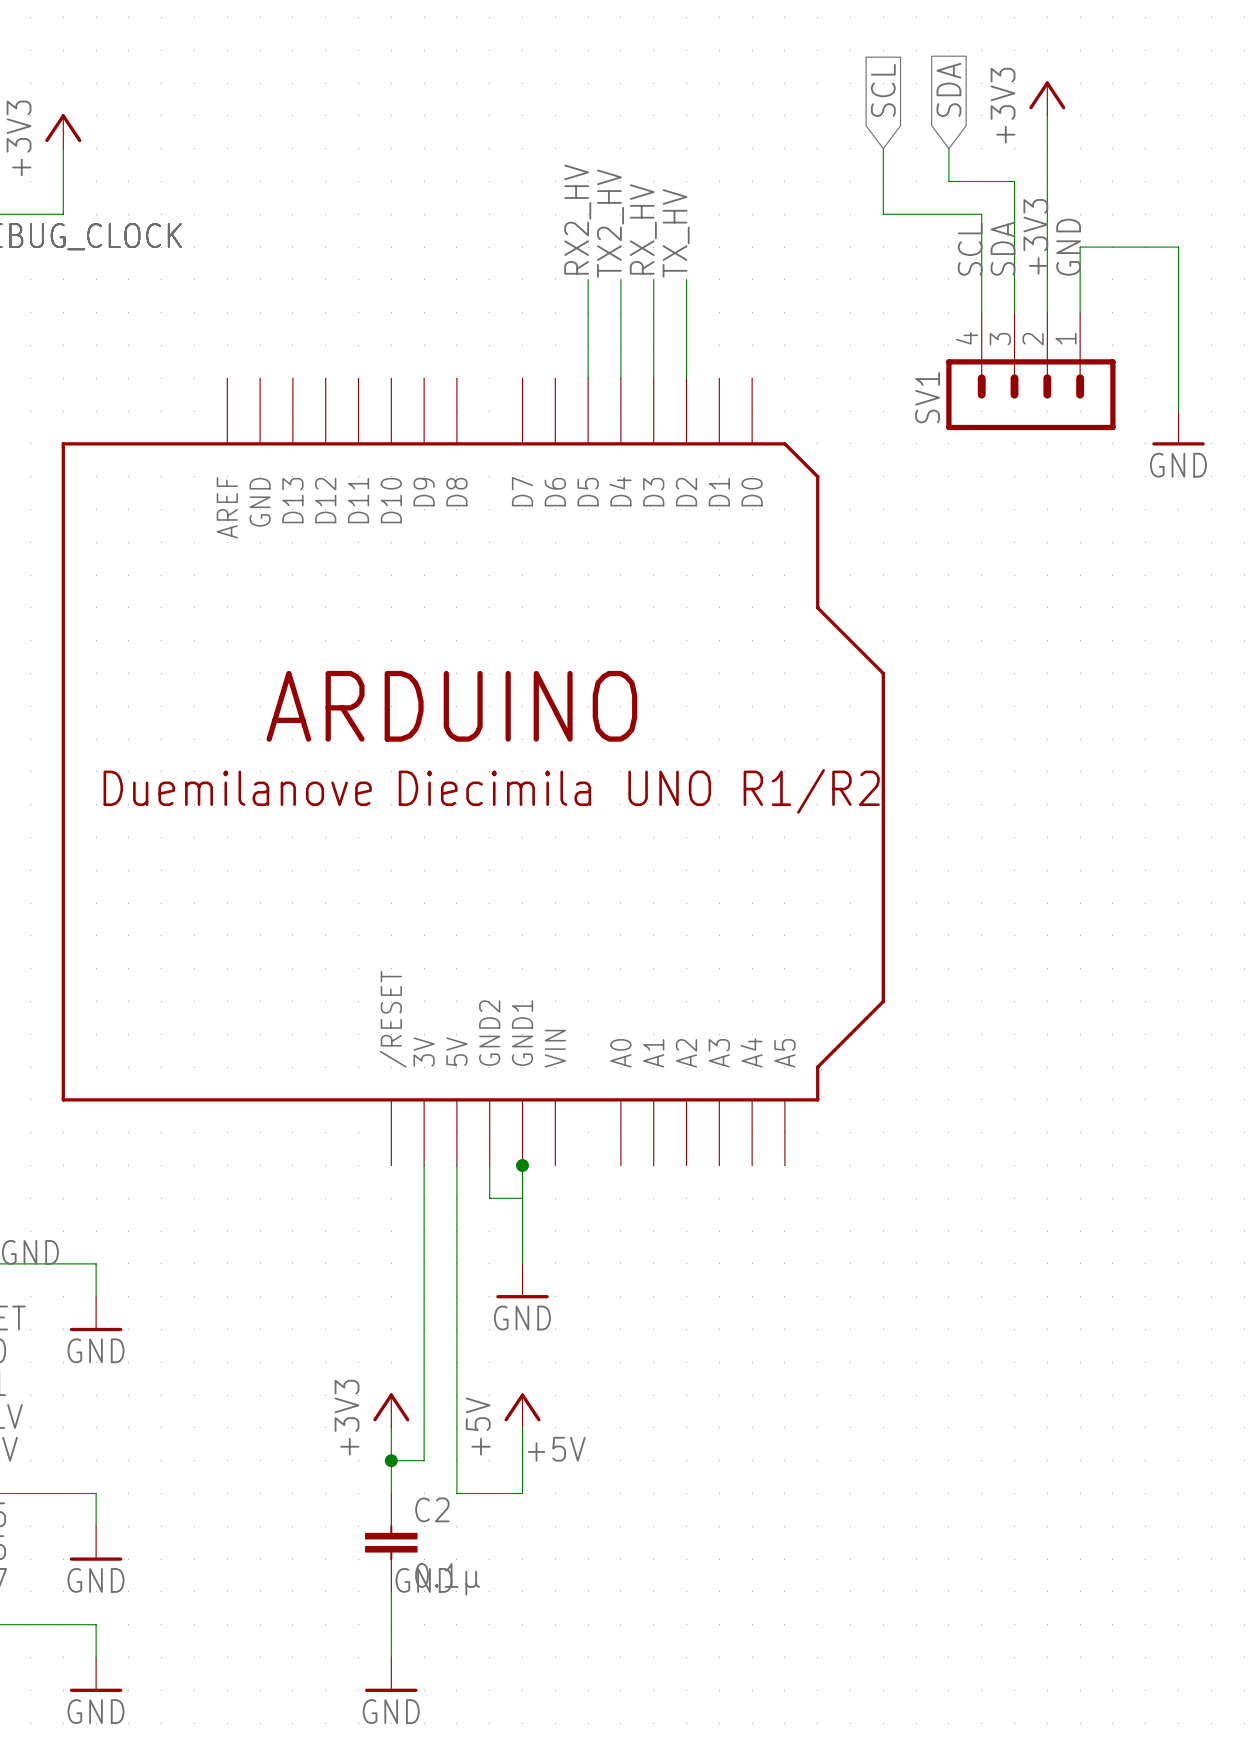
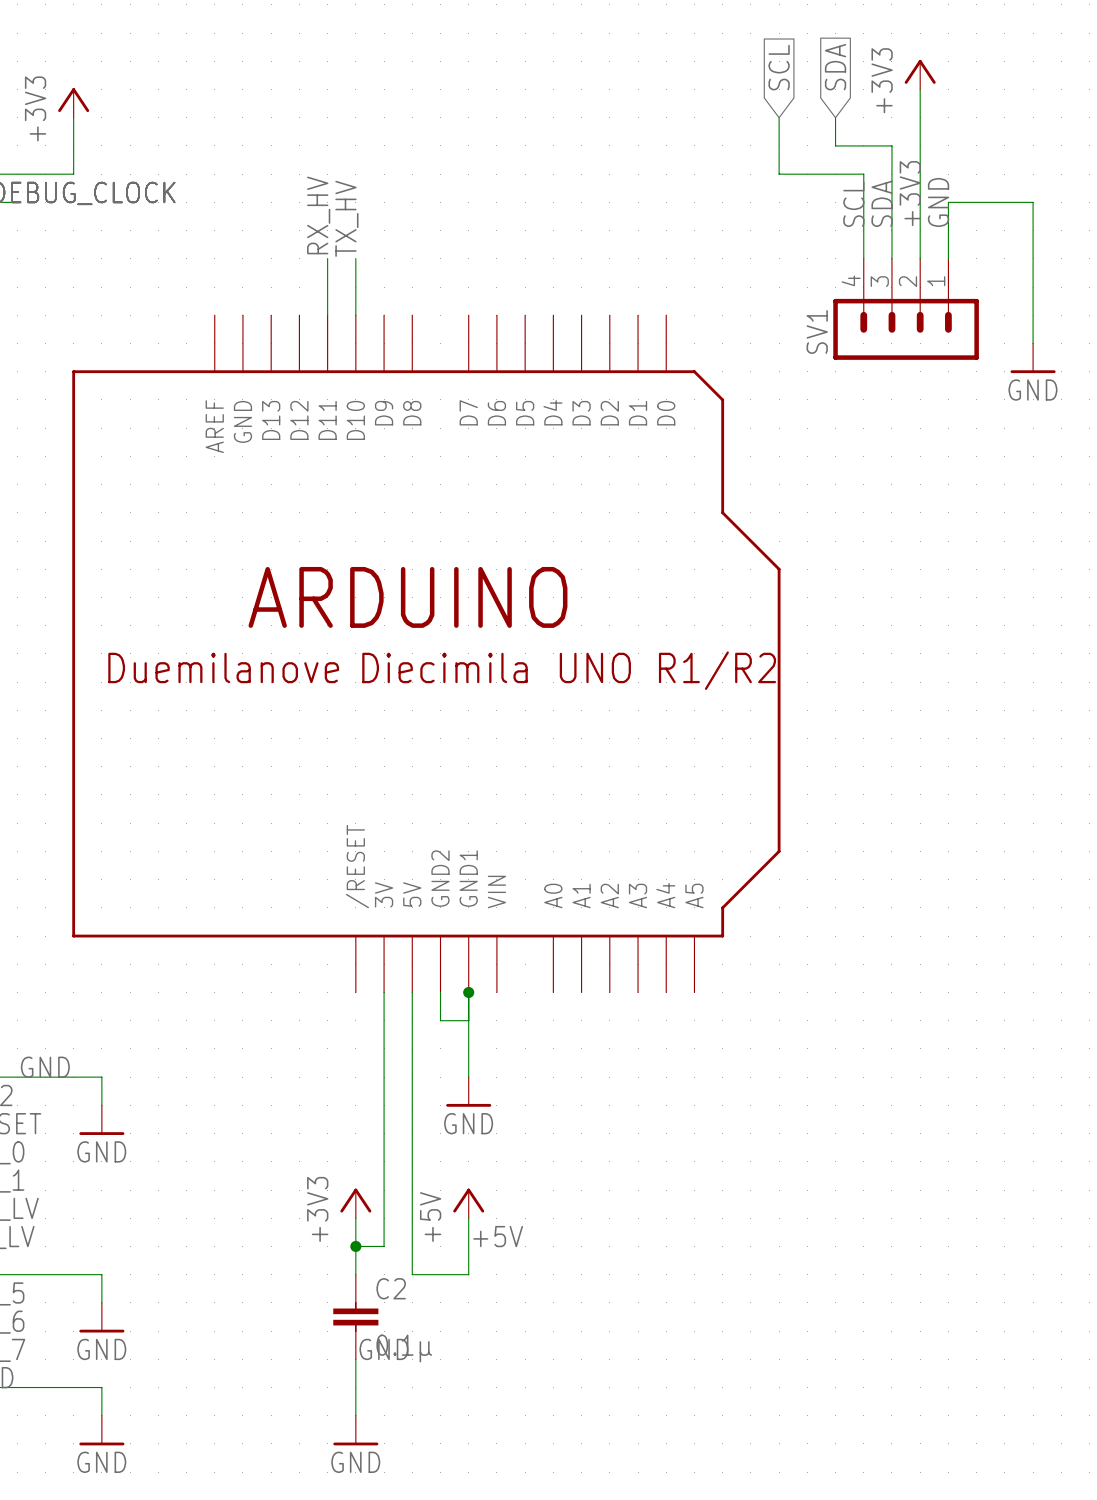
label: RX2_HV (577, 219) -> none
label: TX2_HV (610, 223) -> none
label position: RX_HV (643, 229) -> RX_HV (318, 215)
label position: TX_HV (676, 233) -> TX_HV (346, 218)
wire: (588, 279) (588, 378) -> none
wire: (620, 279) (620, 378) -> none
wire: (653, 279) (653, 378) -> none
wire: (686, 279) (686, 378) -> none
wire: none -> (327, 258) (327, 315)
wire: none -> (355, 258) (355, 315)

